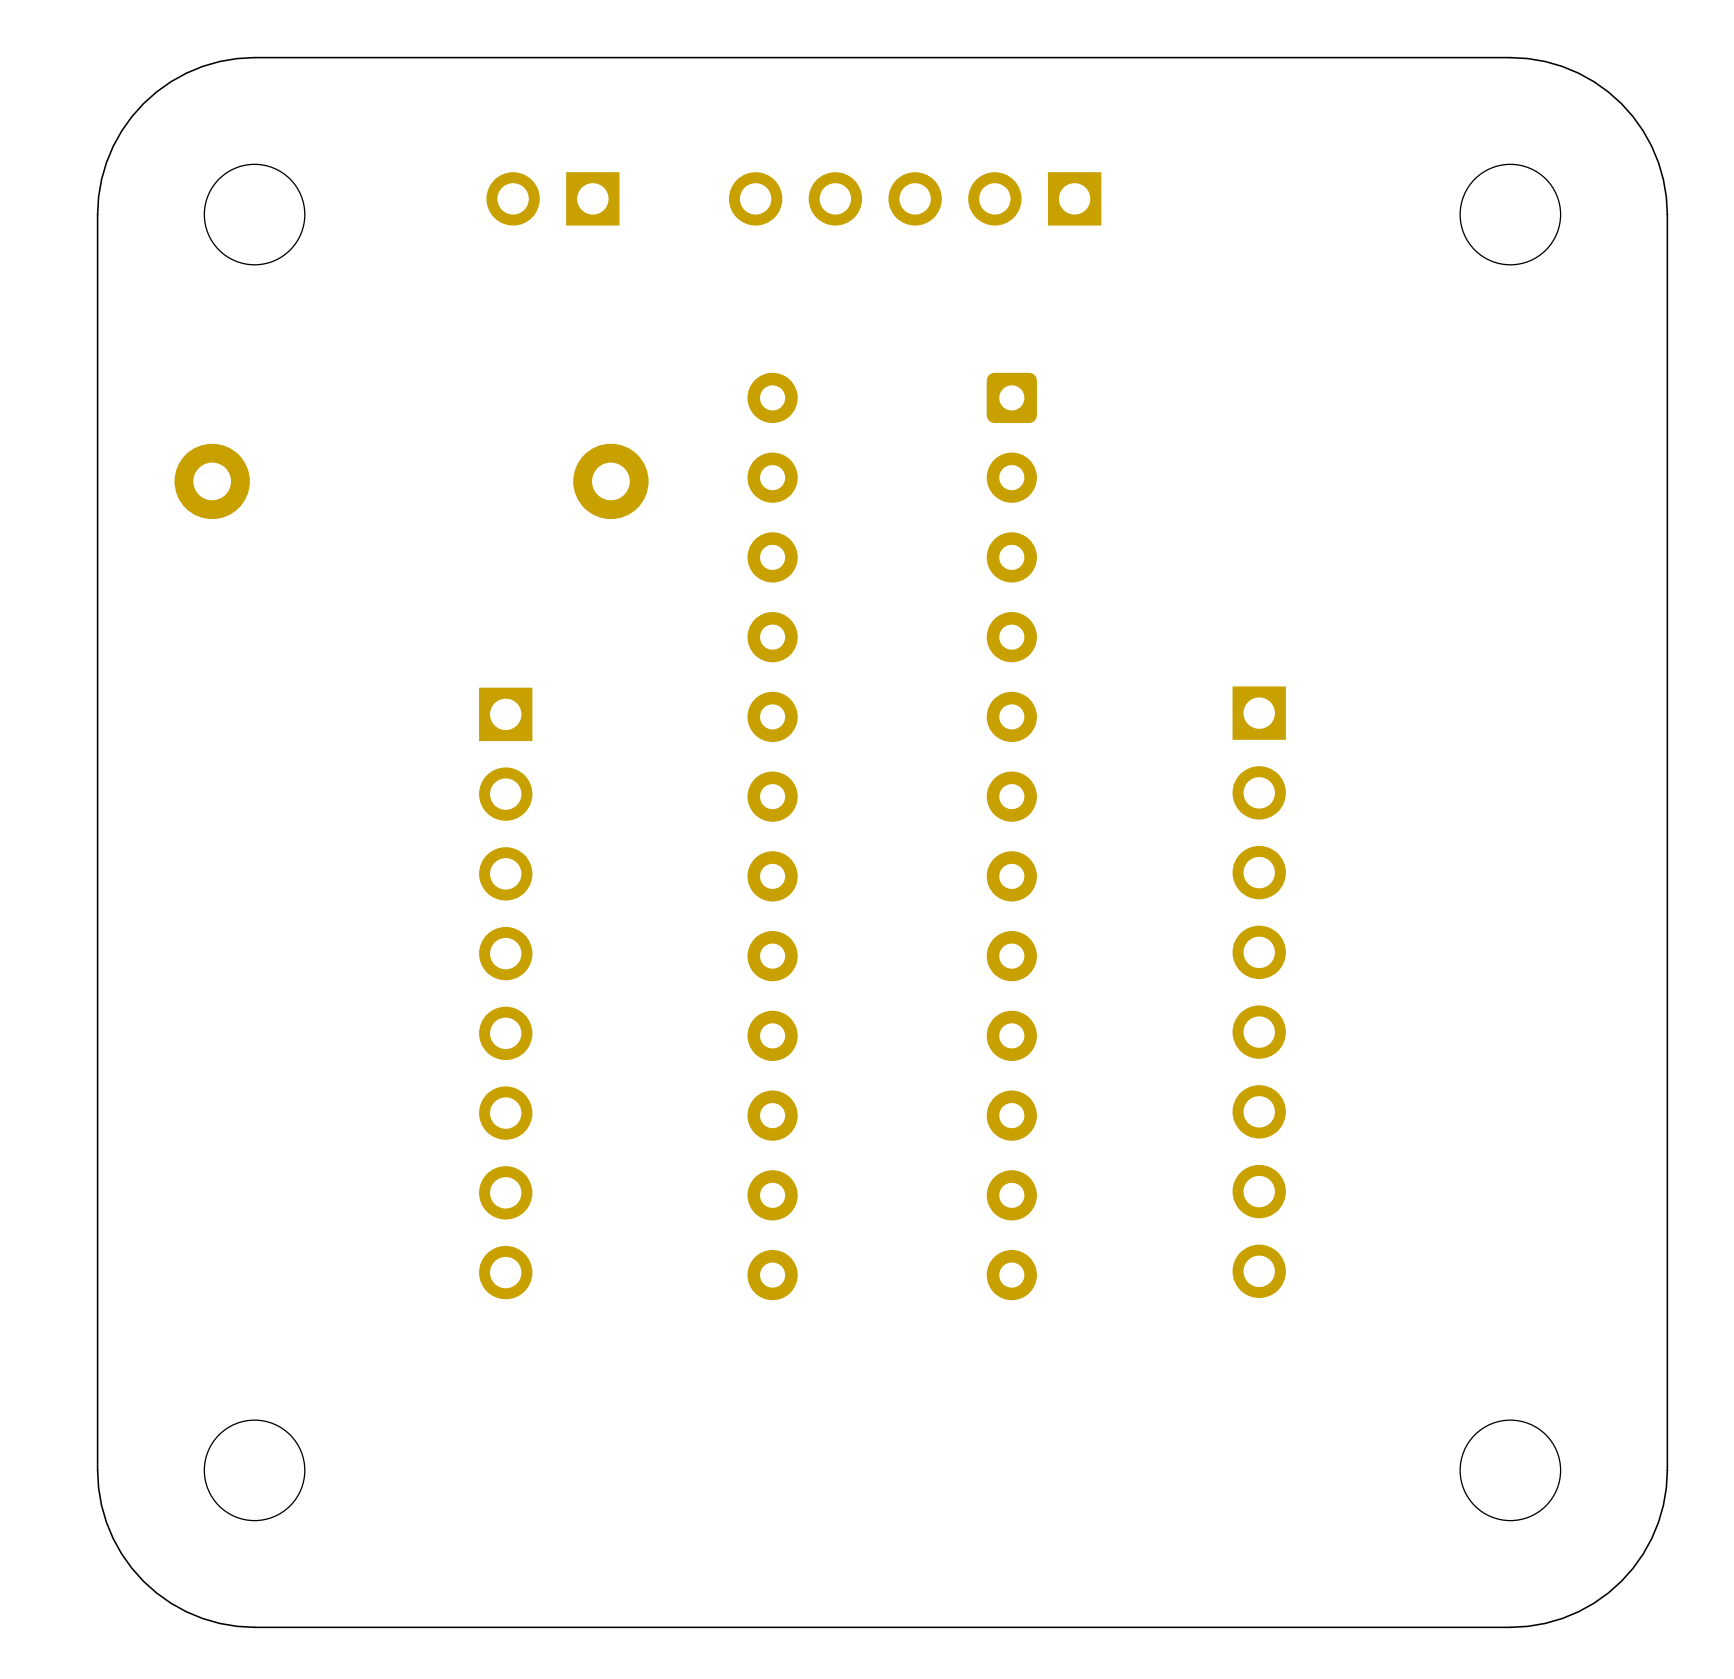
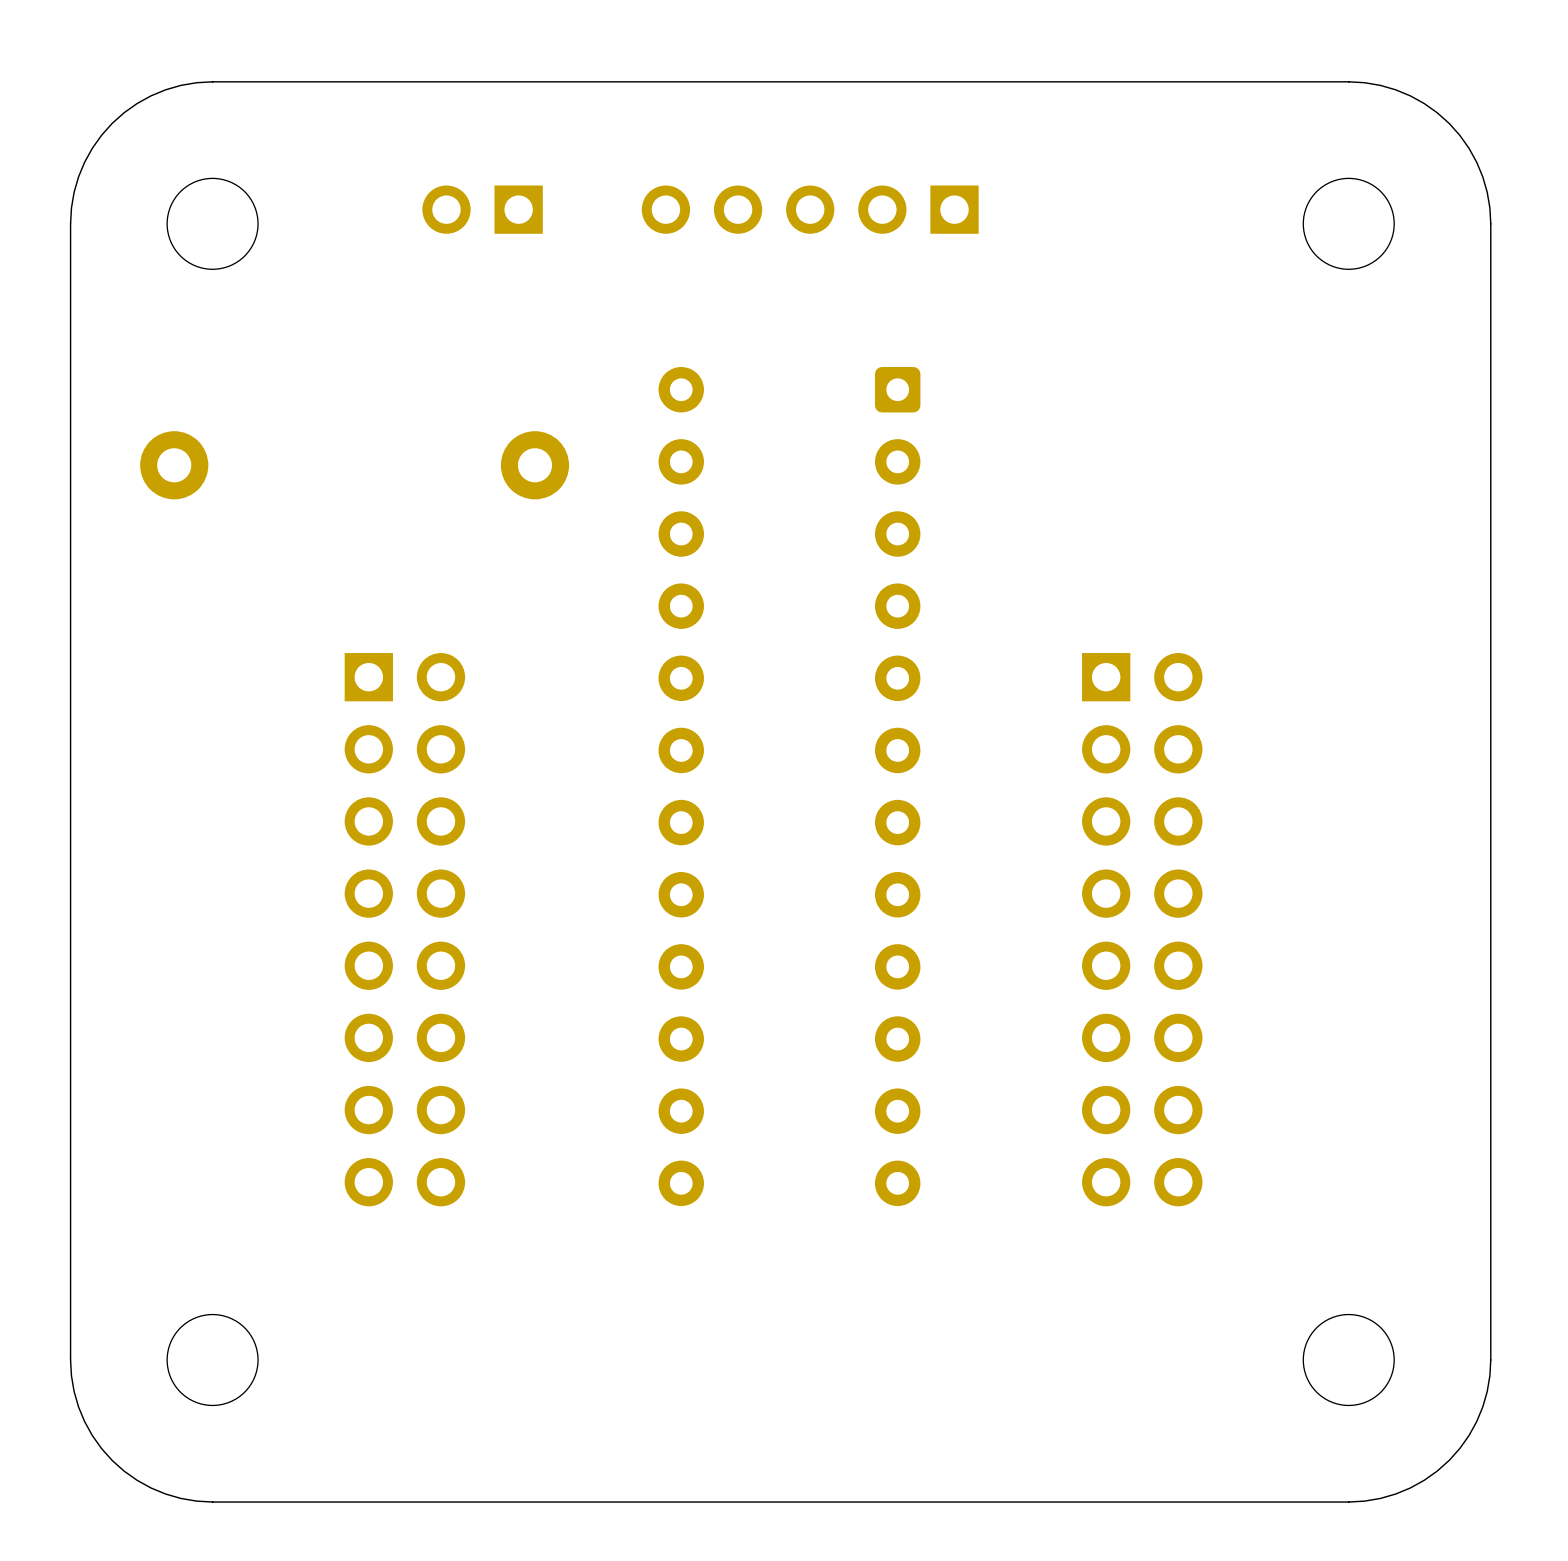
part footprint: [1232, 686, 1286, 1299] -> [1082, 653, 1203, 1207]
part: (505, 993) -> none
part: none -> (404, 929)

